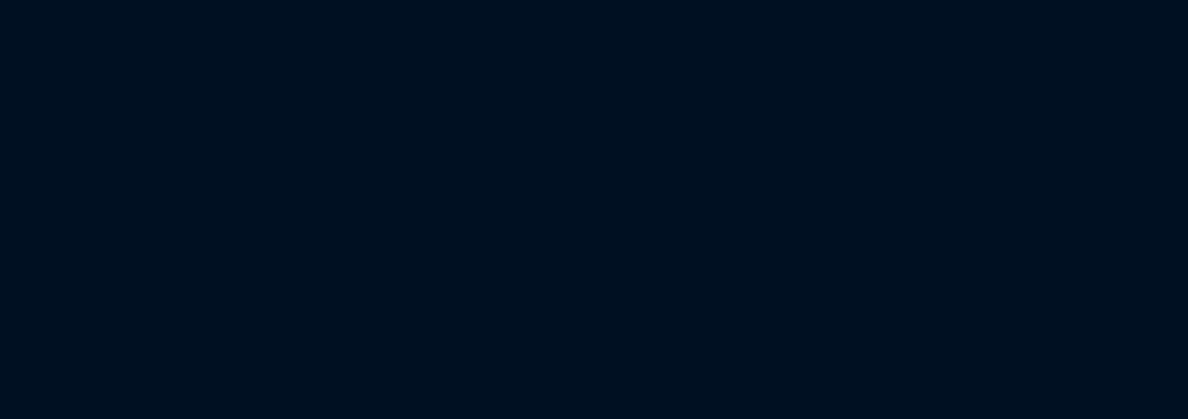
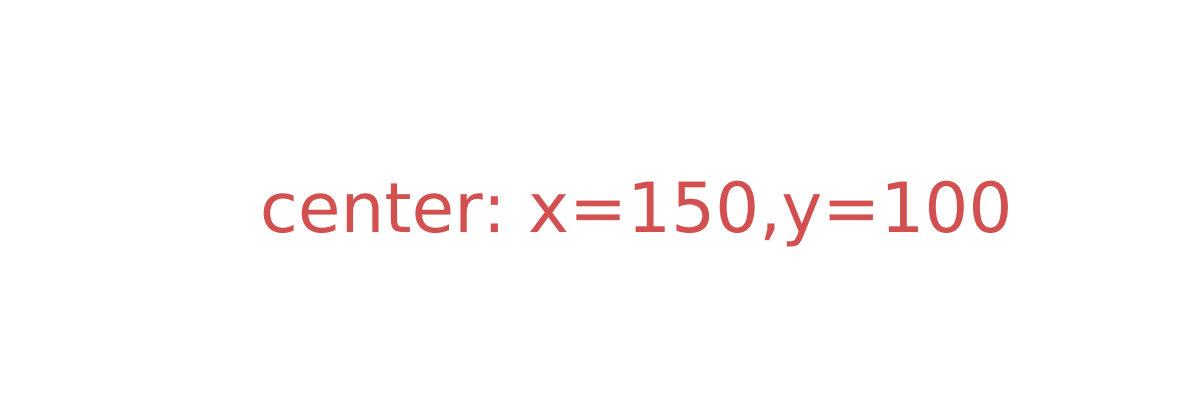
text: none -> center: x=150,y=100 (635, 213)

